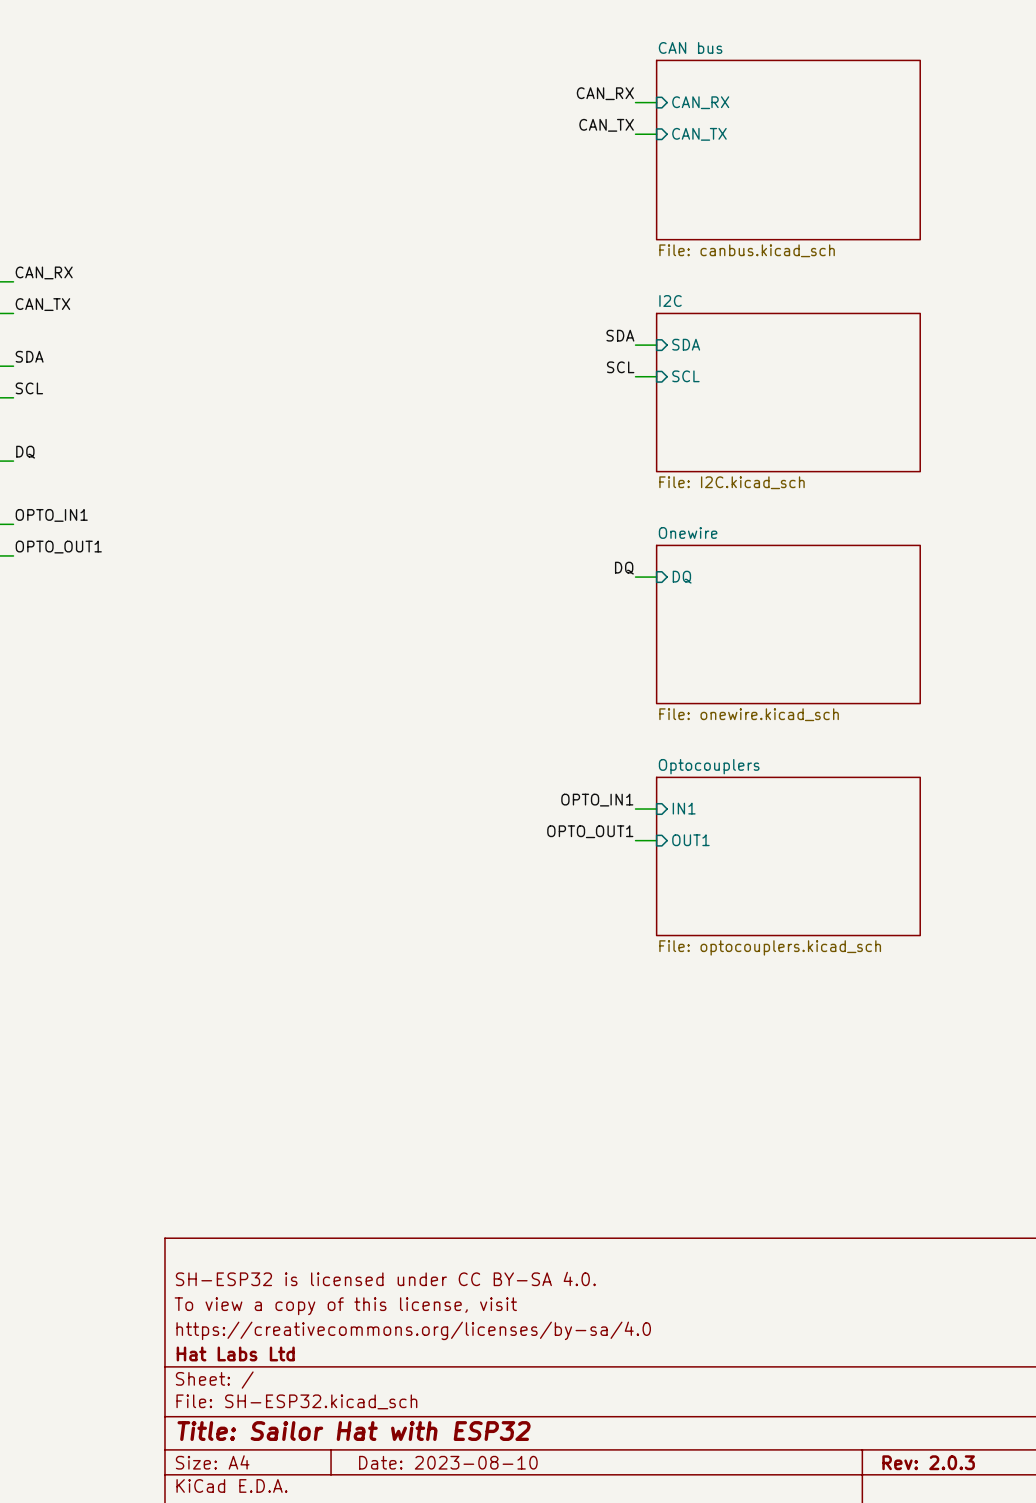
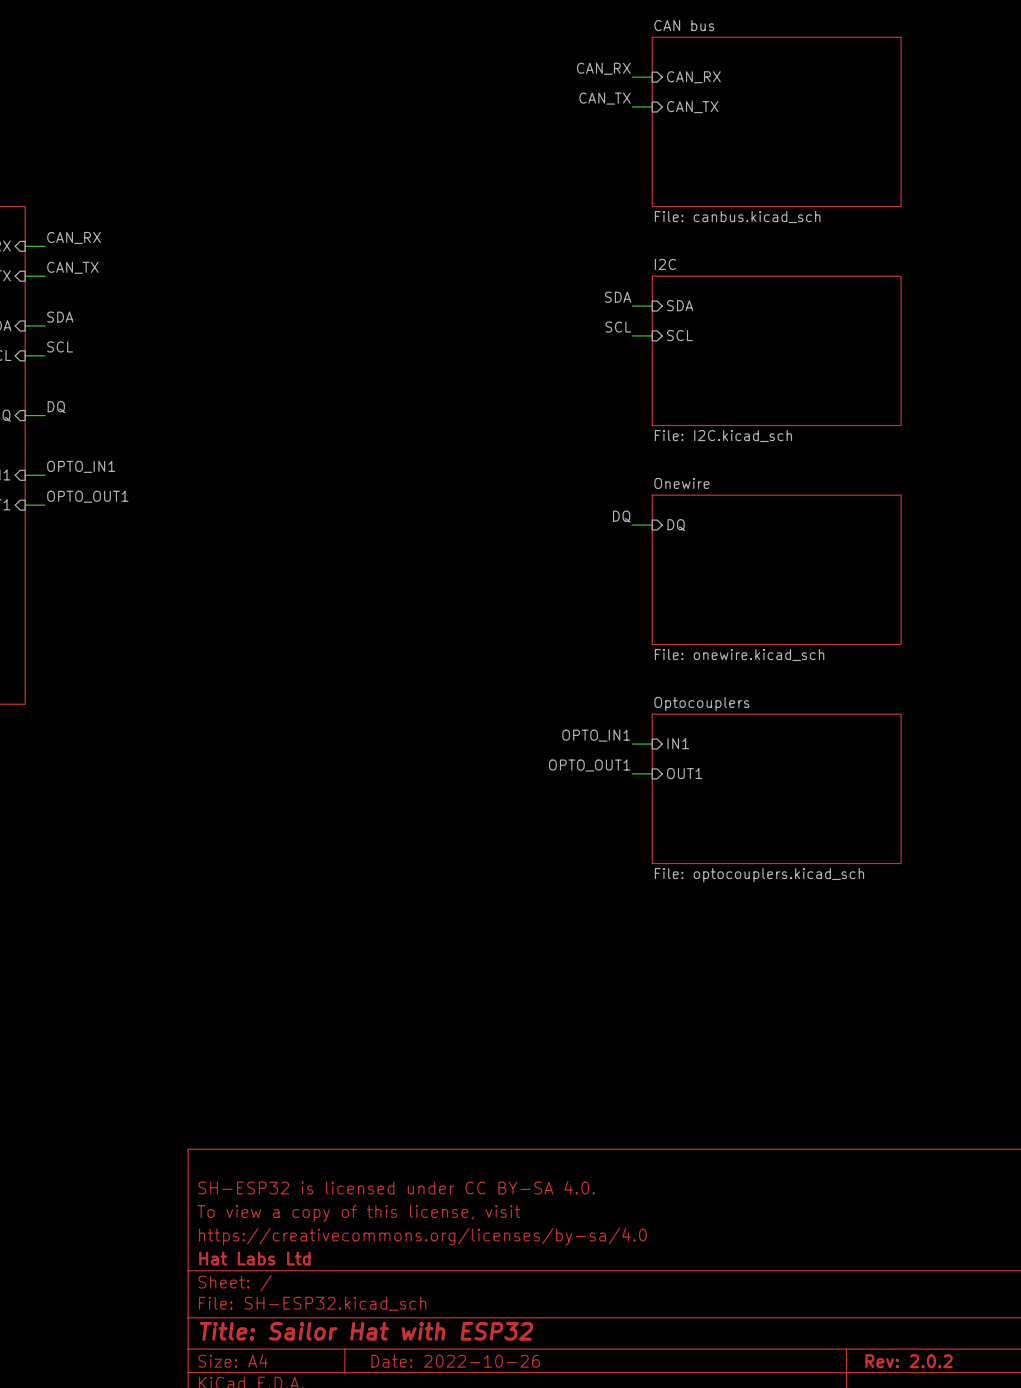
title block: Date: 2023-08-10 (448, 1462) -> Date: 2022-10-26 (455, 1361)
title block: Rev: 2.0.3 (928, 1462) -> Rev: 2.0.2 (909, 1361)

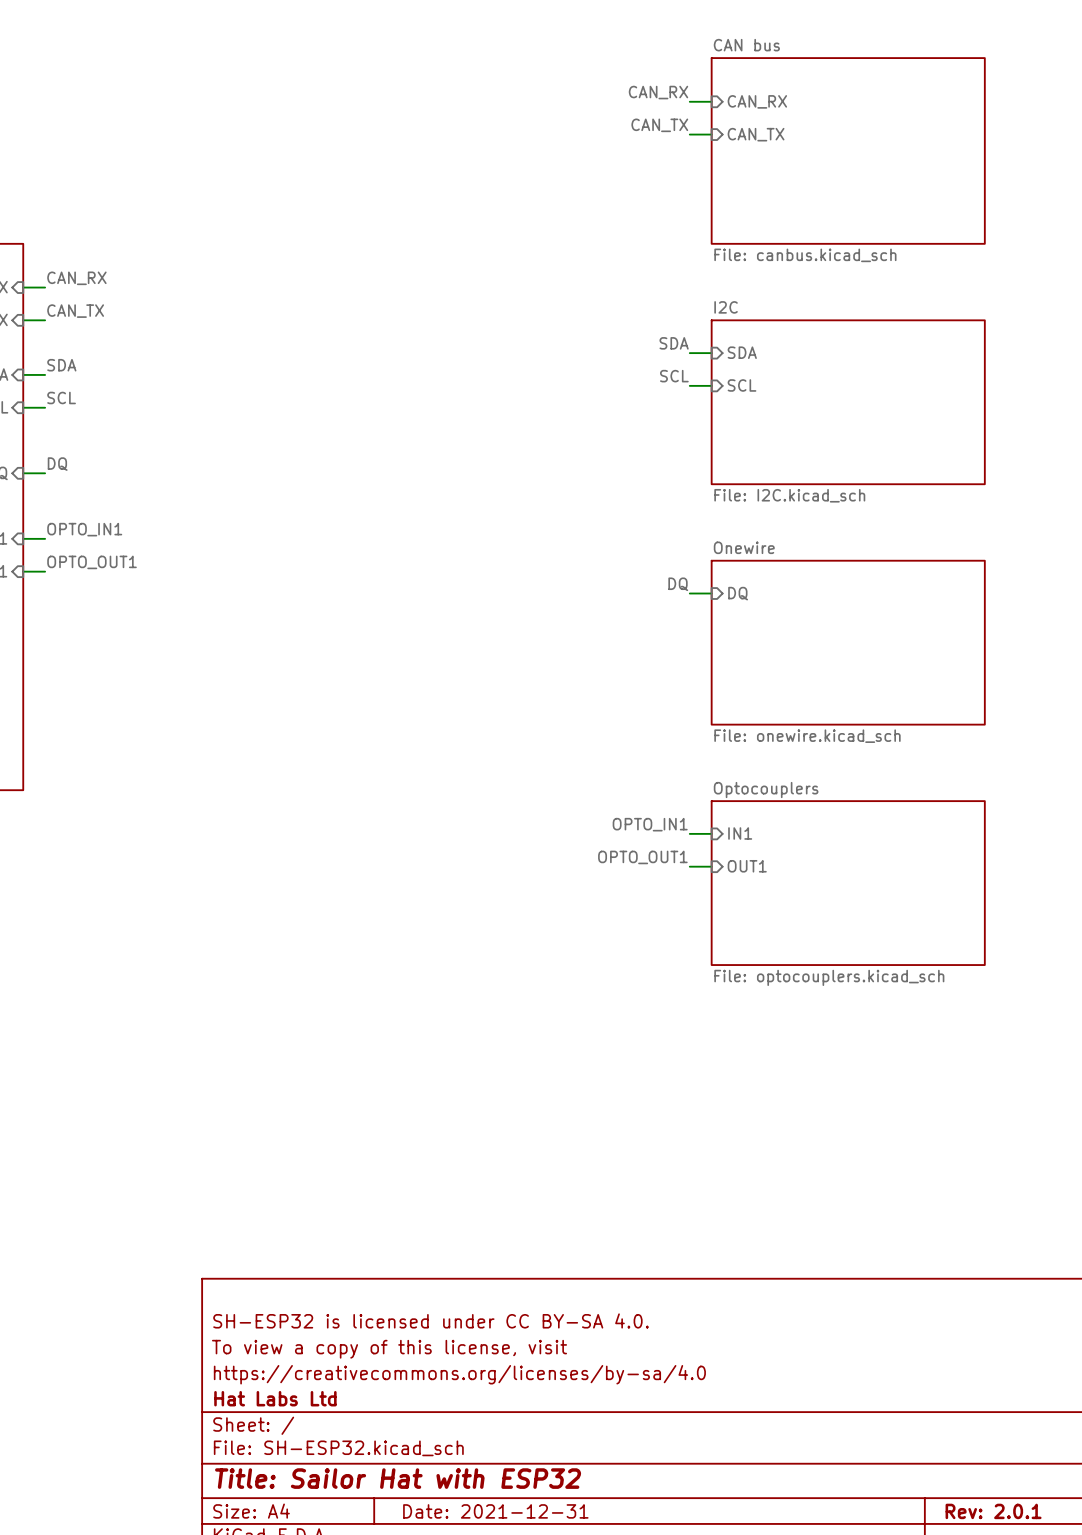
title block: Date: 2022-10-26 (455, 1361) -> Date: 2021-12-31 (495, 1511)
title block: Rev: 2.0.2 (909, 1361) -> Rev: 2.0.1 (993, 1511)

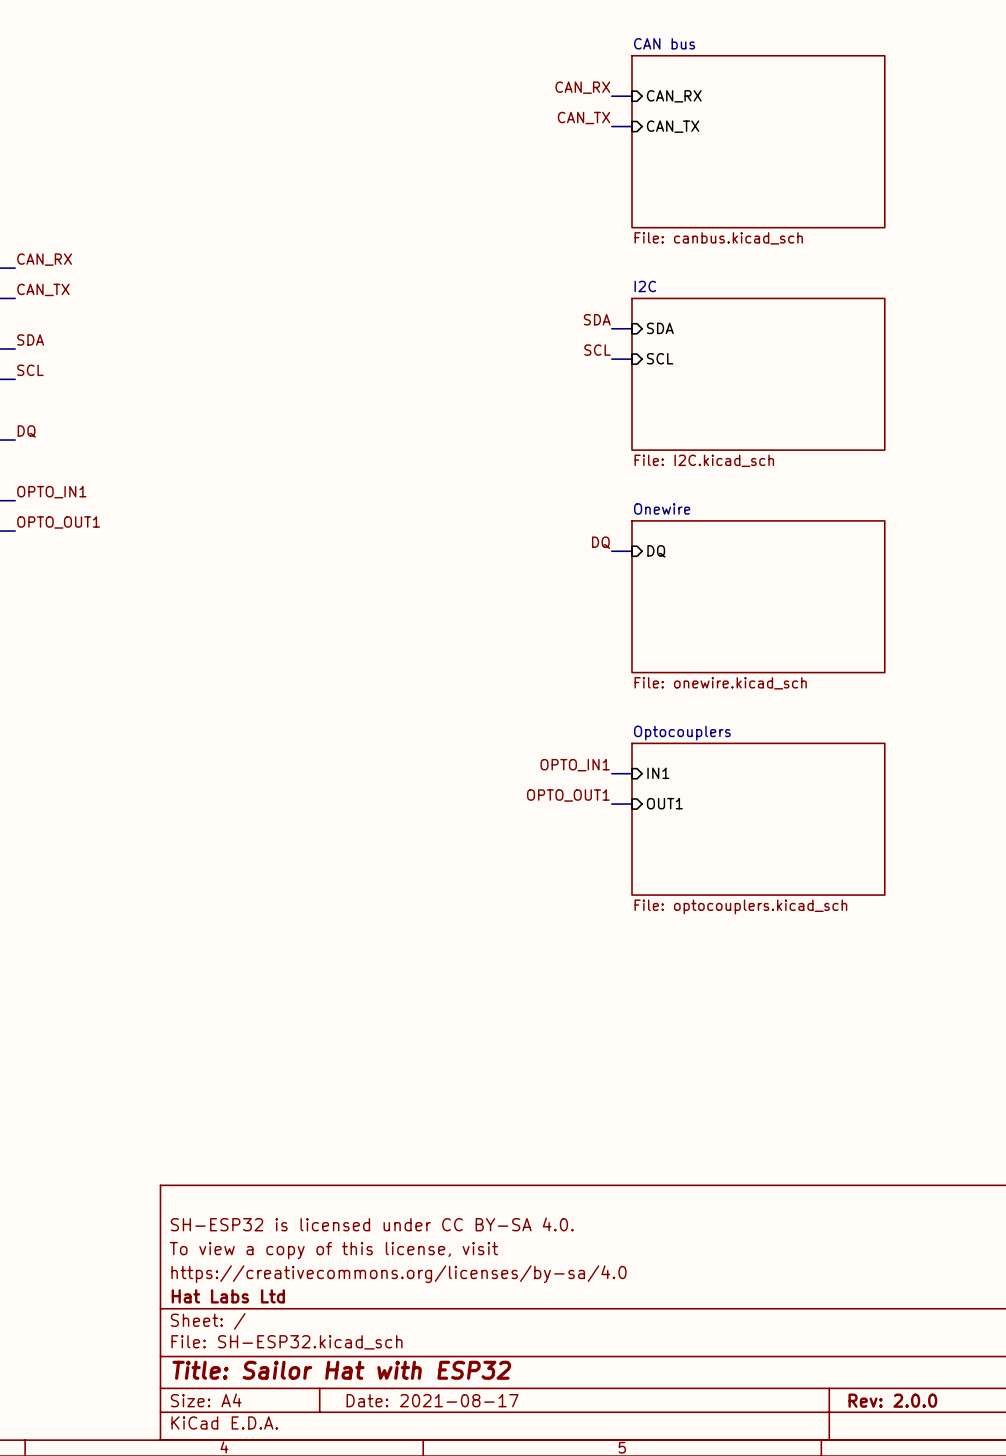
title block: Date: 2021-12-31 (495, 1511) -> Date: 2021-08-17 (432, 1400)
title block: Rev: 2.0.1 (993, 1511) -> Rev: 2.0.0 (892, 1400)

